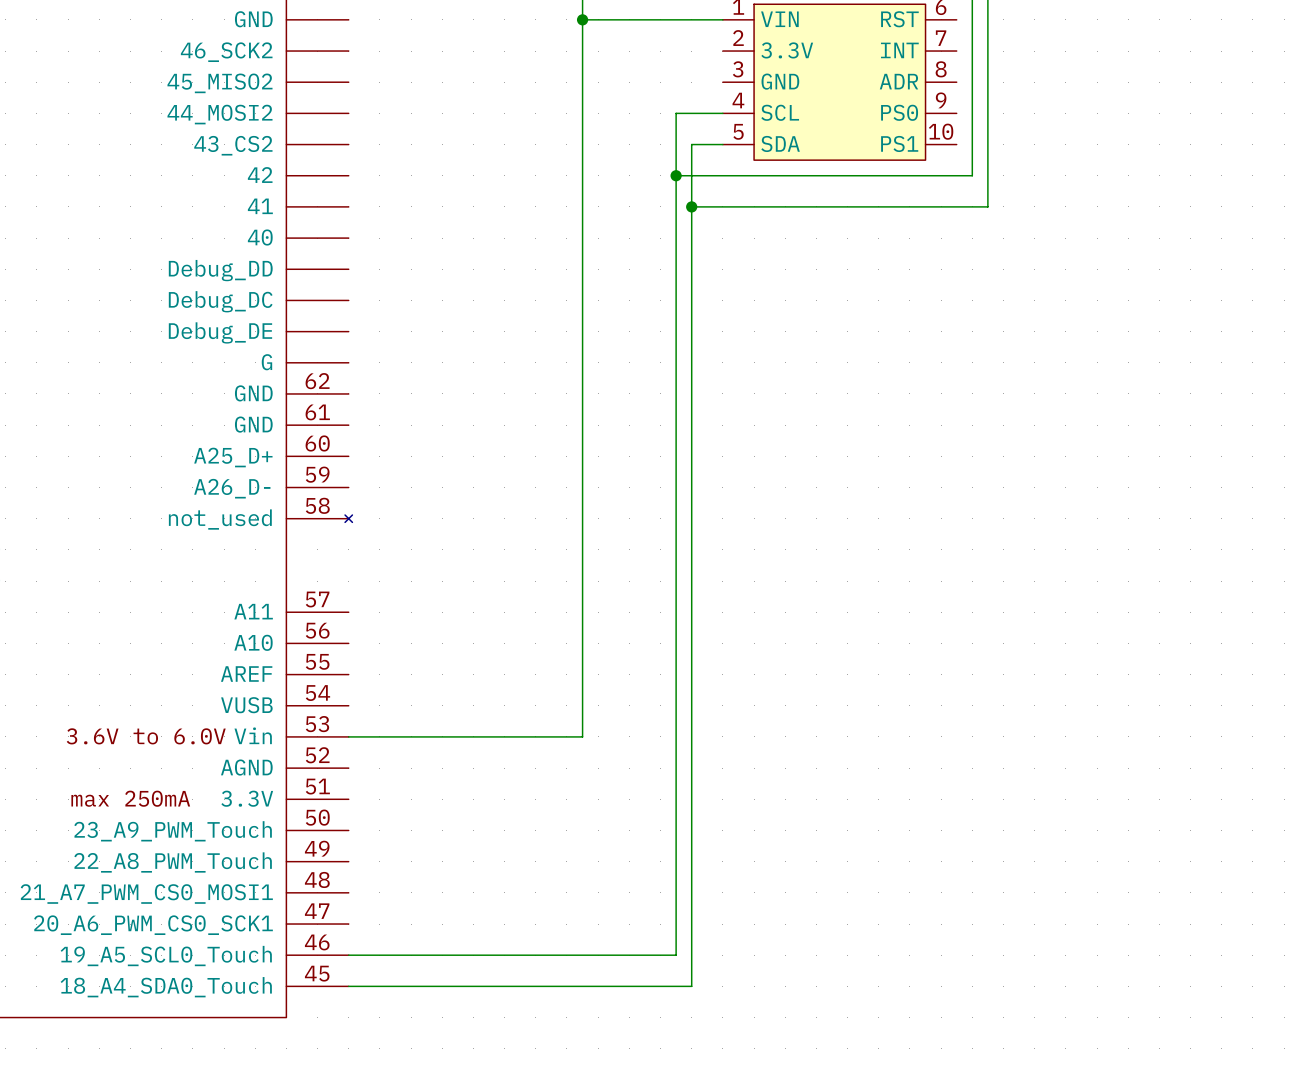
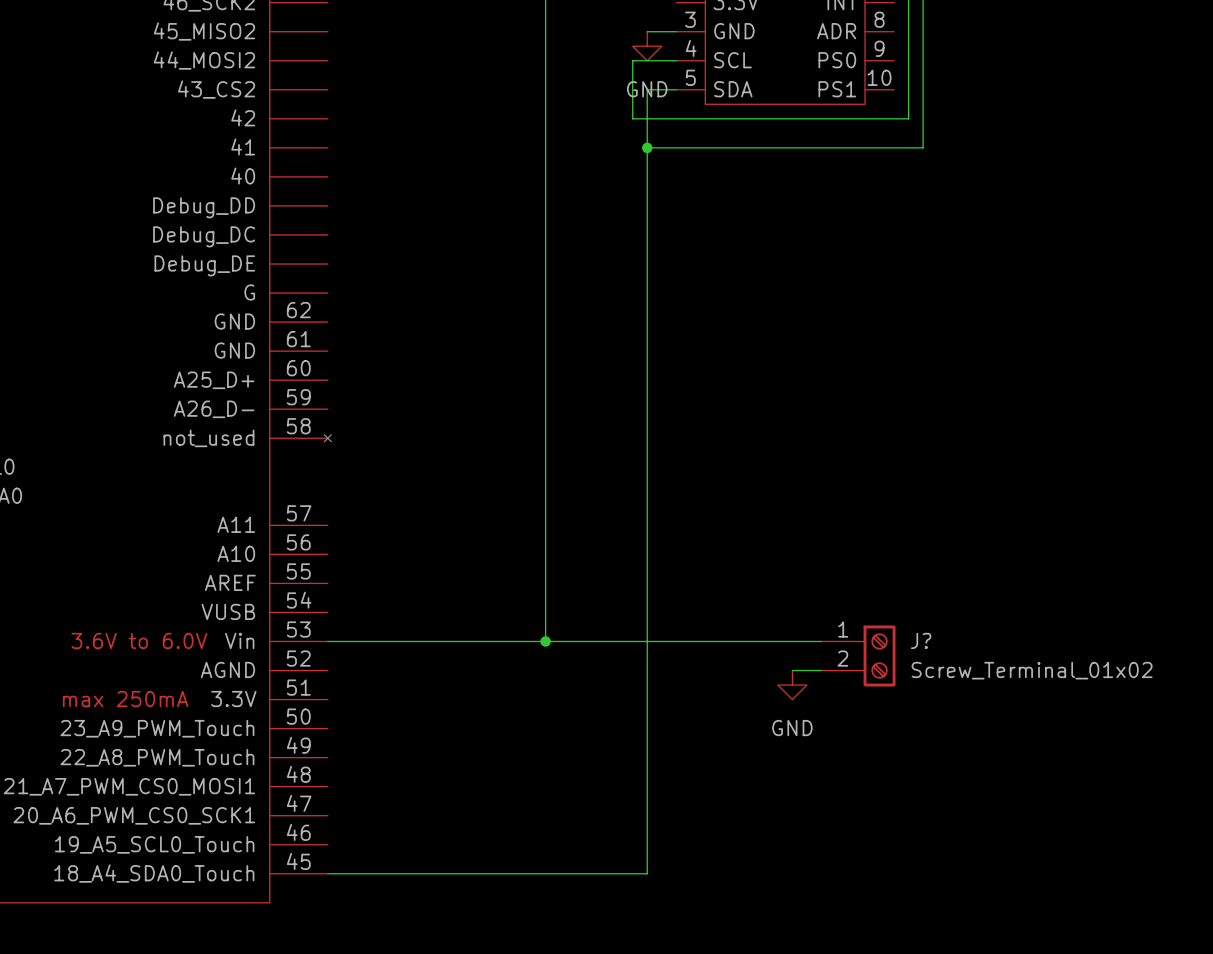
wire: none -> (647, 31) (676, 31)
power symbol: none -> GND (647, 46)
wire: (676, 175) (676, 955) (348, 955) -> none
junction: (676, 175) -> none
wire: none -> (545, 641) (821, 641)
junction: none -> (545, 641)
J?: none -> Screw_Terminal_01x02 (858, 656)
wire: none -> (792, 670) (821, 670)
power symbol: none -> GND (792, 685)

